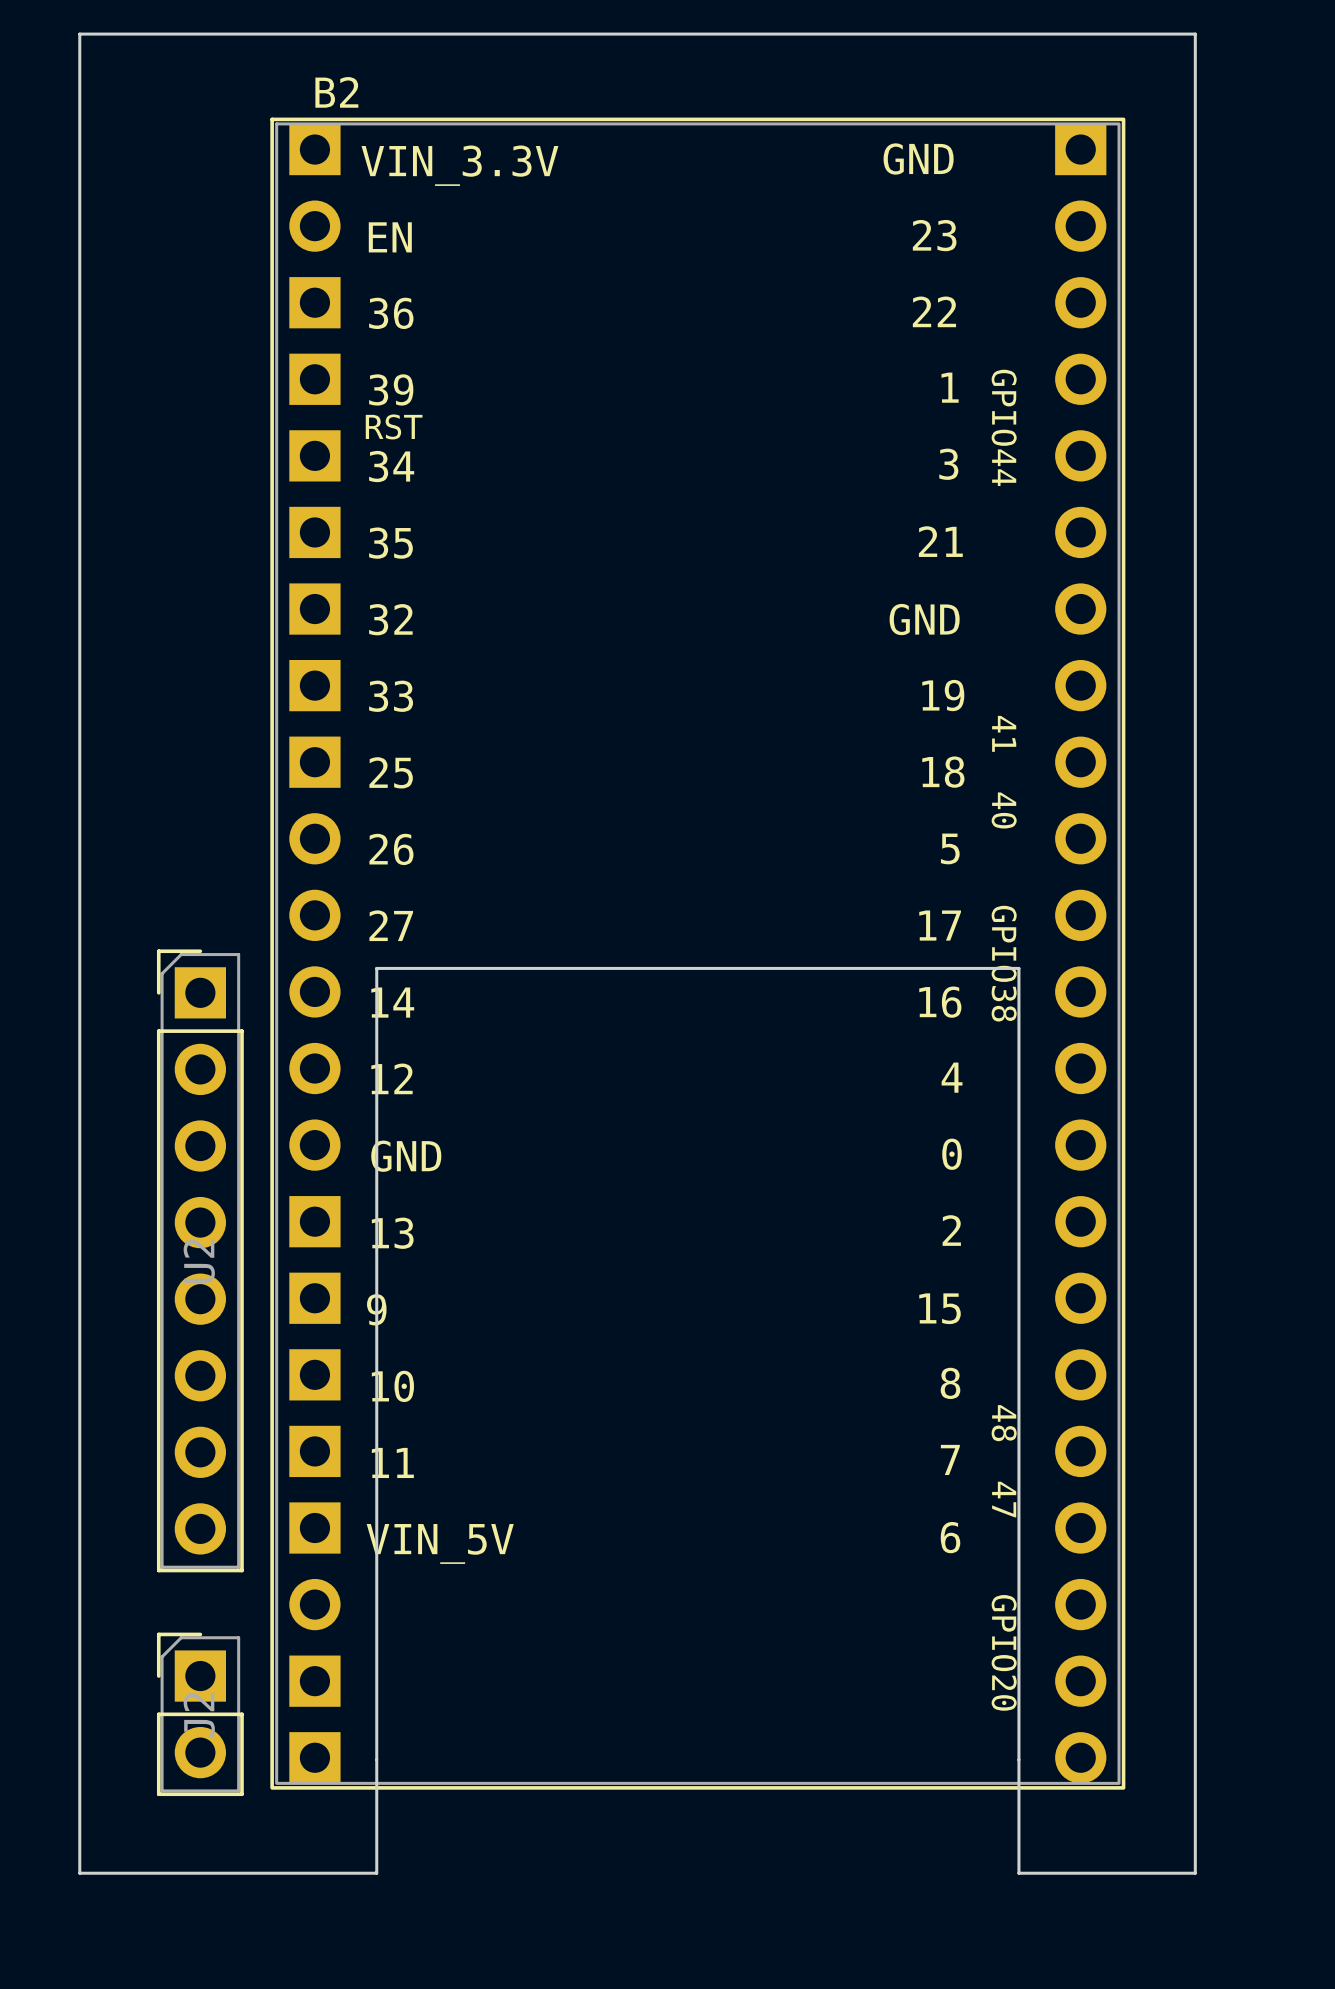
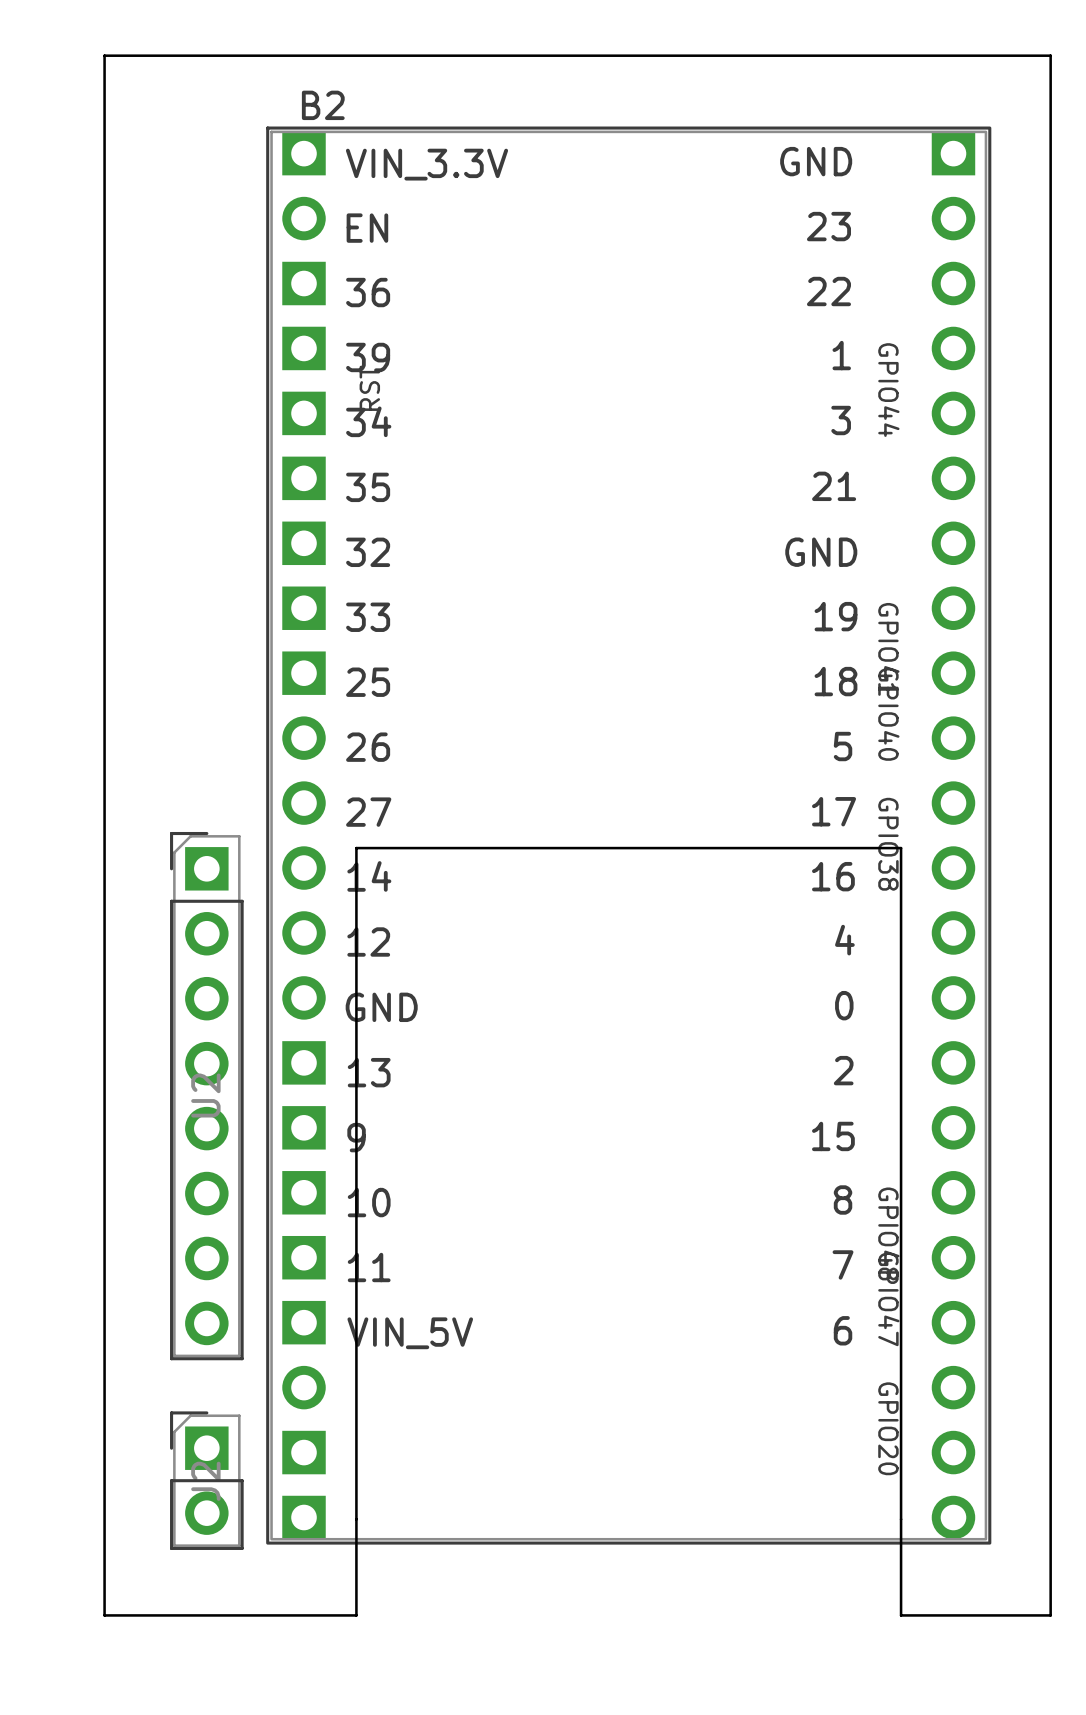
B2 footprint: [270, 117, 1126, 1790] -> [266, 126, 992, 1545]

